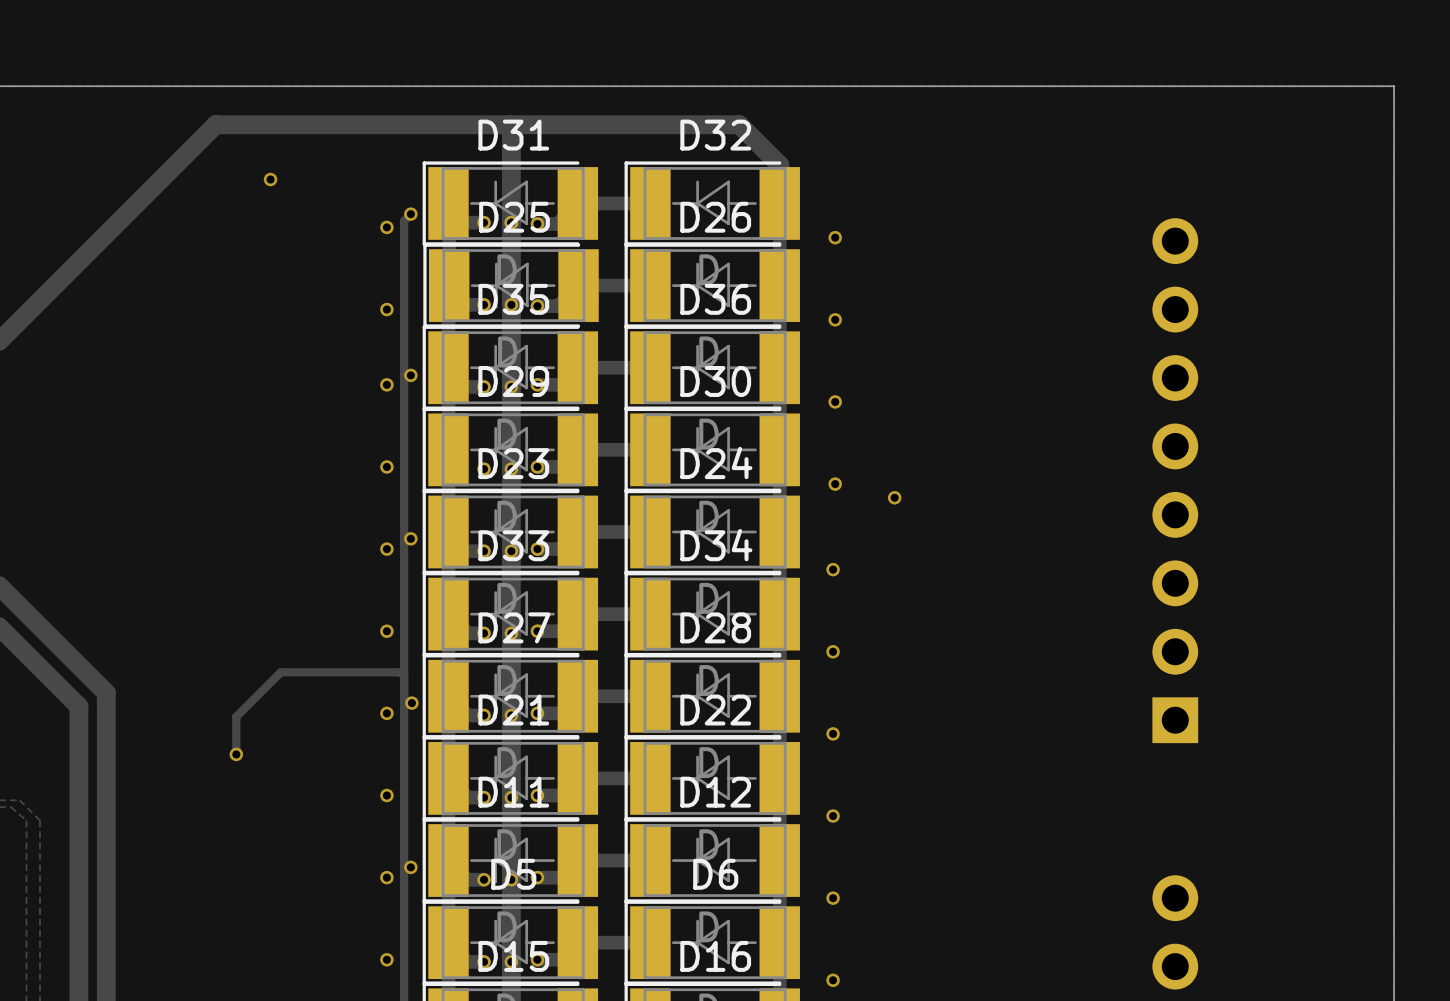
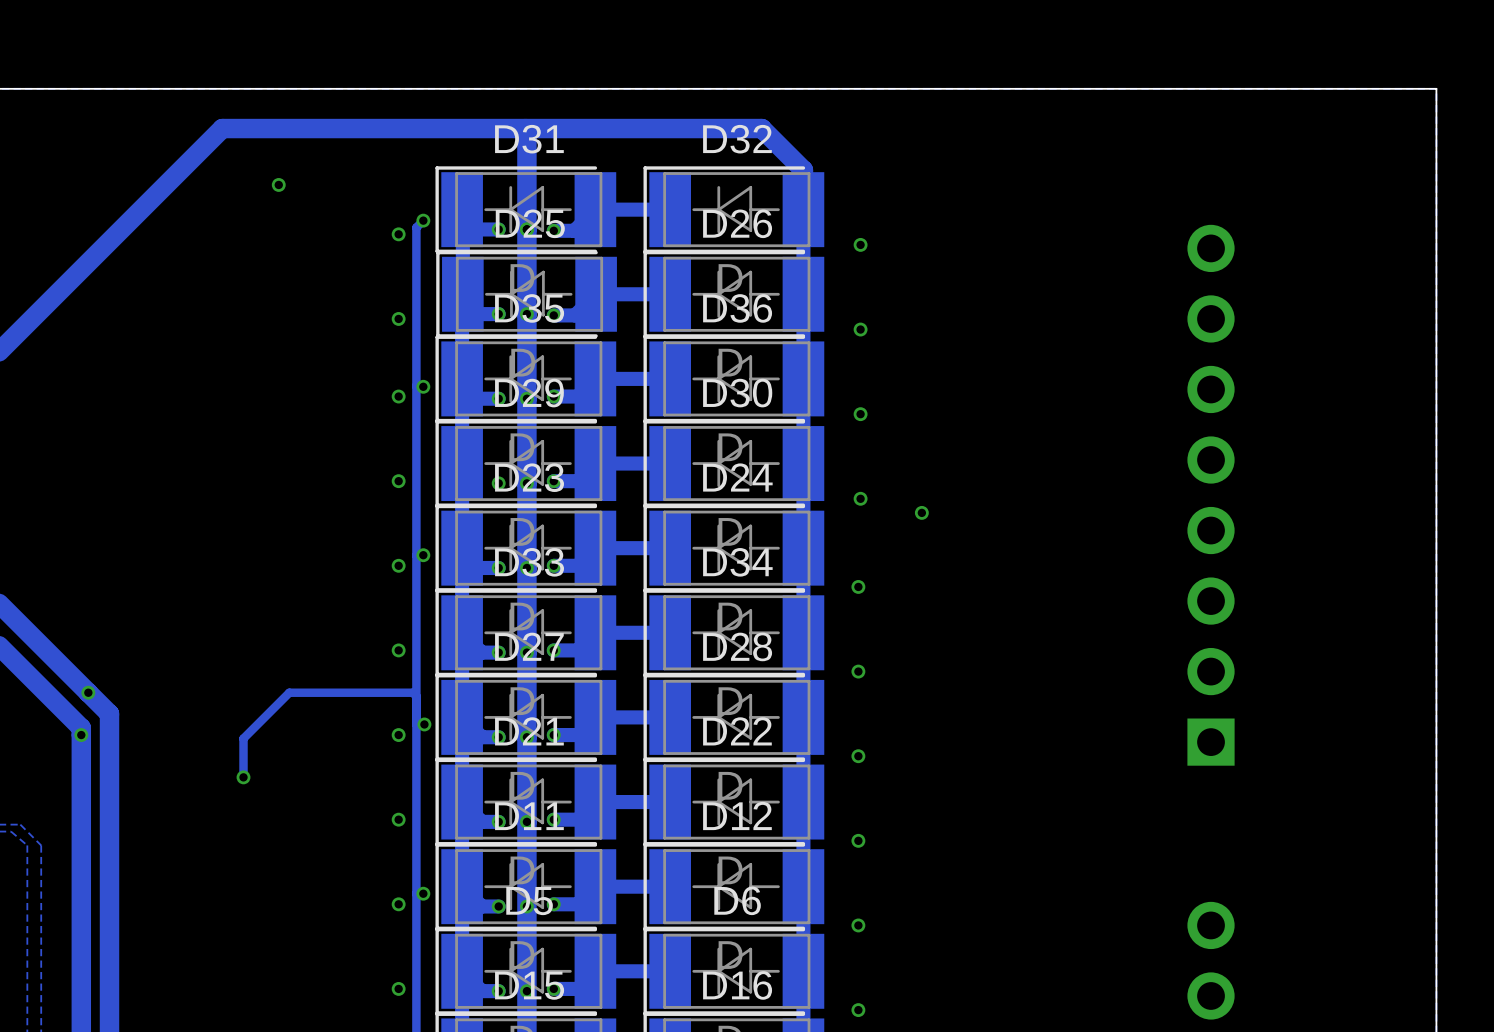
via: none -> (88, 692)
via: none -> (81, 735)

